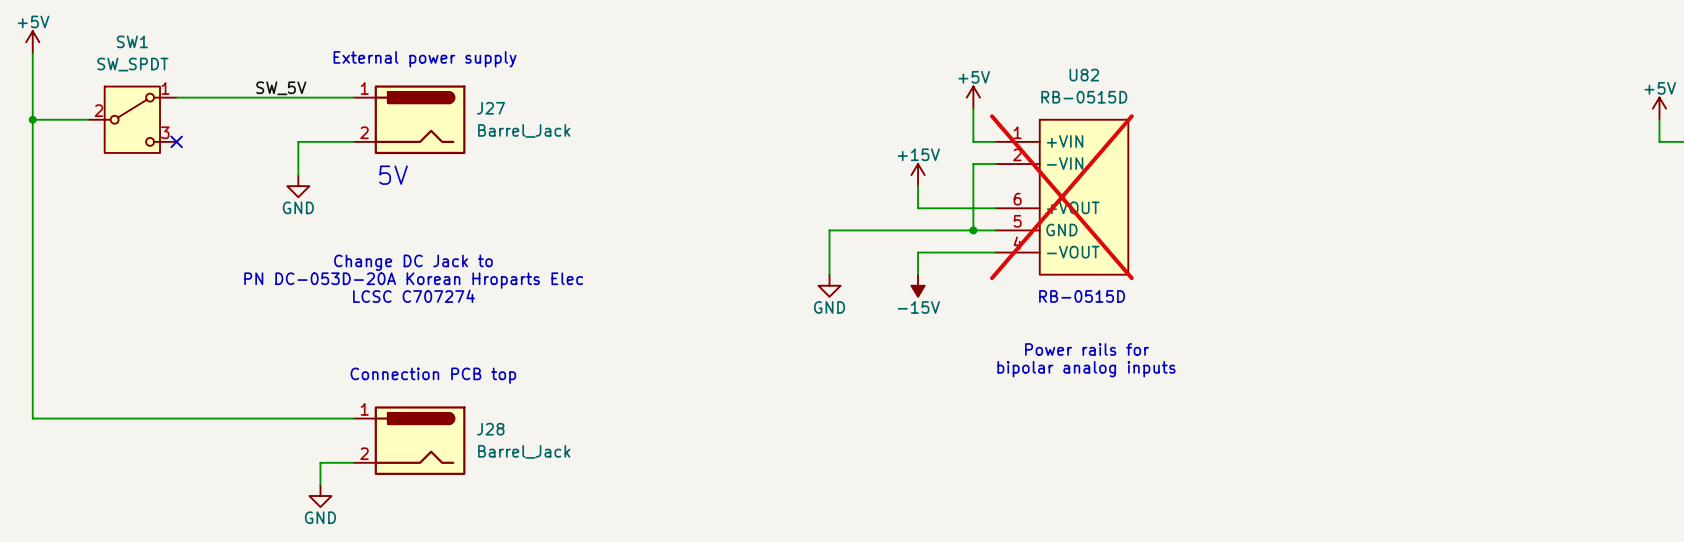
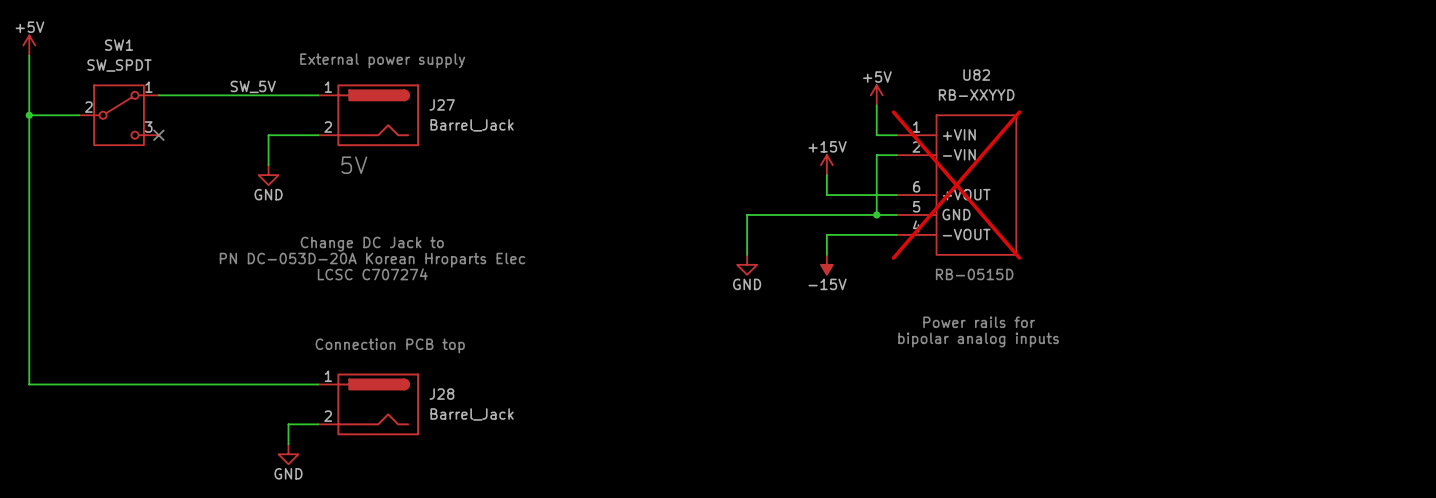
U82 value: RB-0515D (1084, 97) -> RB-XXYYD (976, 94)

